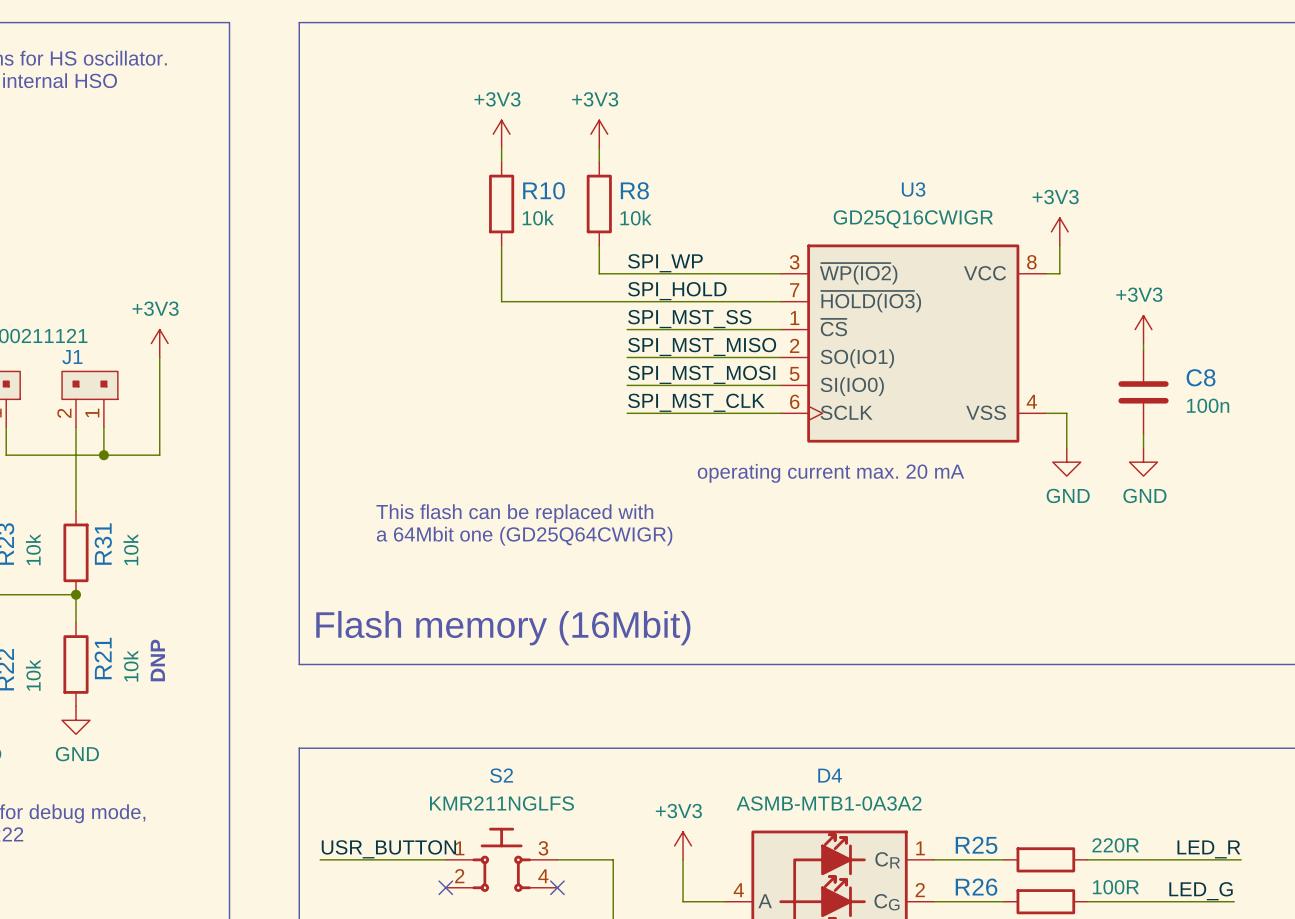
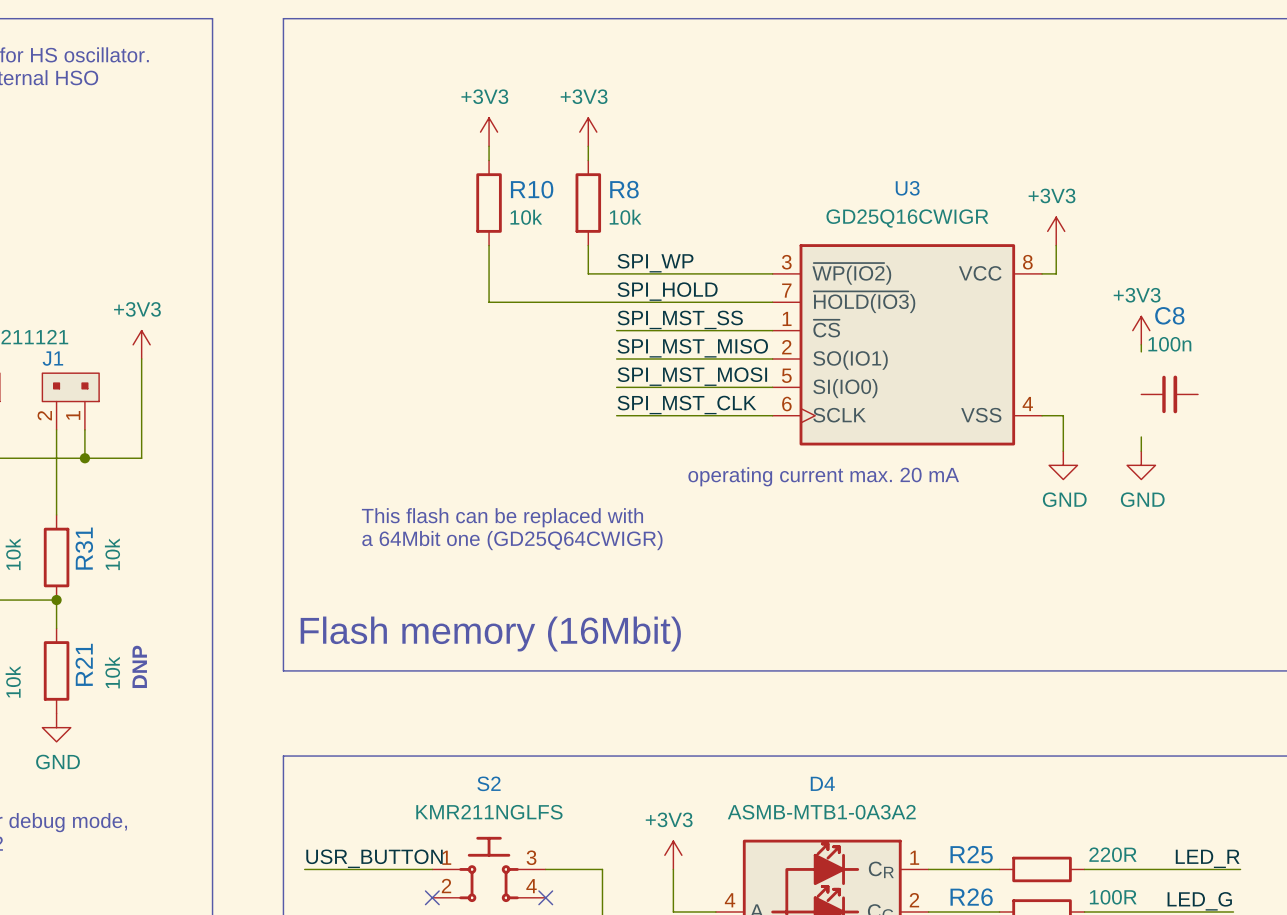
C8 symbol: [1118, 350, 1169, 435] -> [1141, 375, 1199, 414]
C8 name position: C8 (1201, 377) -> C8 (1169, 315)
C8 text position: 100n (1208, 405) -> 100n (1169, 344)

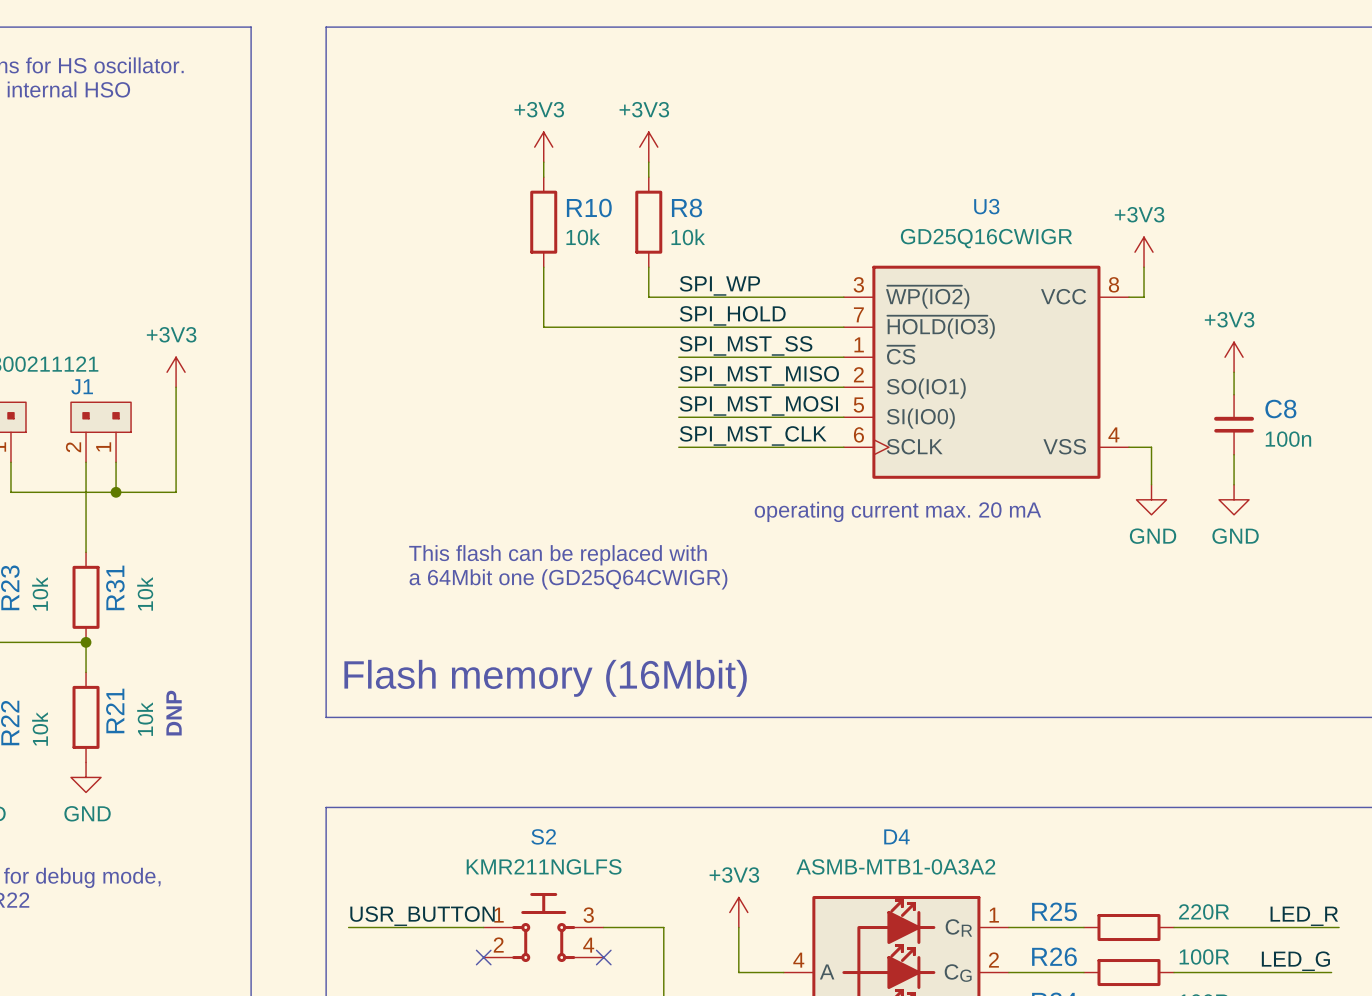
C8 name position: C8 (1169, 315) -> C8 (1280, 409)
C8 text position: 100n (1169, 344) -> 100n (1288, 439)
wire: none -> (1234, 379) (1234, 394)
C8 rotation: 0° (1169, 394) -> 90° counterclockwise (1234, 424)
wire: none -> (1234, 454) (1234, 469)

